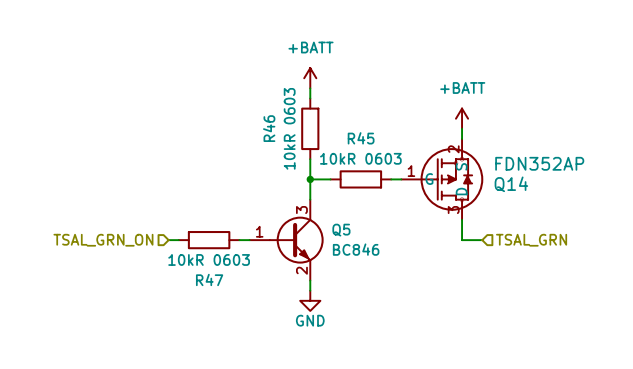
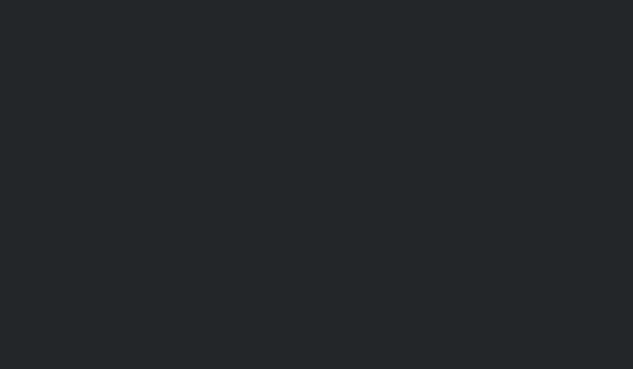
power symbol: +BATT (310, 78) -> none
wire: (310, 88) (310, 98) -> none
power symbol: +BATT (462, 118) -> none
R46: 10kR 0603 (310, 128) -> none
wire: (462, 128) (462, 138) -> none
wire: (310, 159) (310, 199) -> none
wire: (310, 179) (330, 179) -> none
junction: (310, 179) -> none
R45: 10kR 0603 (360, 179) -> none
wire: (391, 179) (401, 179) -> none
Q14: FDN352AP (442, 179) -> none
wire: (462, 219) (462, 240) (482, 240) -> none
hierarchical label: TSAL_GRN_ON (103, 240) -> none
wire: (168, 240) (178, 240) -> none
R47: 10kR 0603 (209, 240) -> none
wire: (239, 240) (249, 240) -> none
Q5: BC846 (286, 240) -> none
hierarchical label: TSAL_GRN (531, 240) -> none
wire: (310, 280) (310, 290) -> none
power symbol: GND (310, 300) -> none

